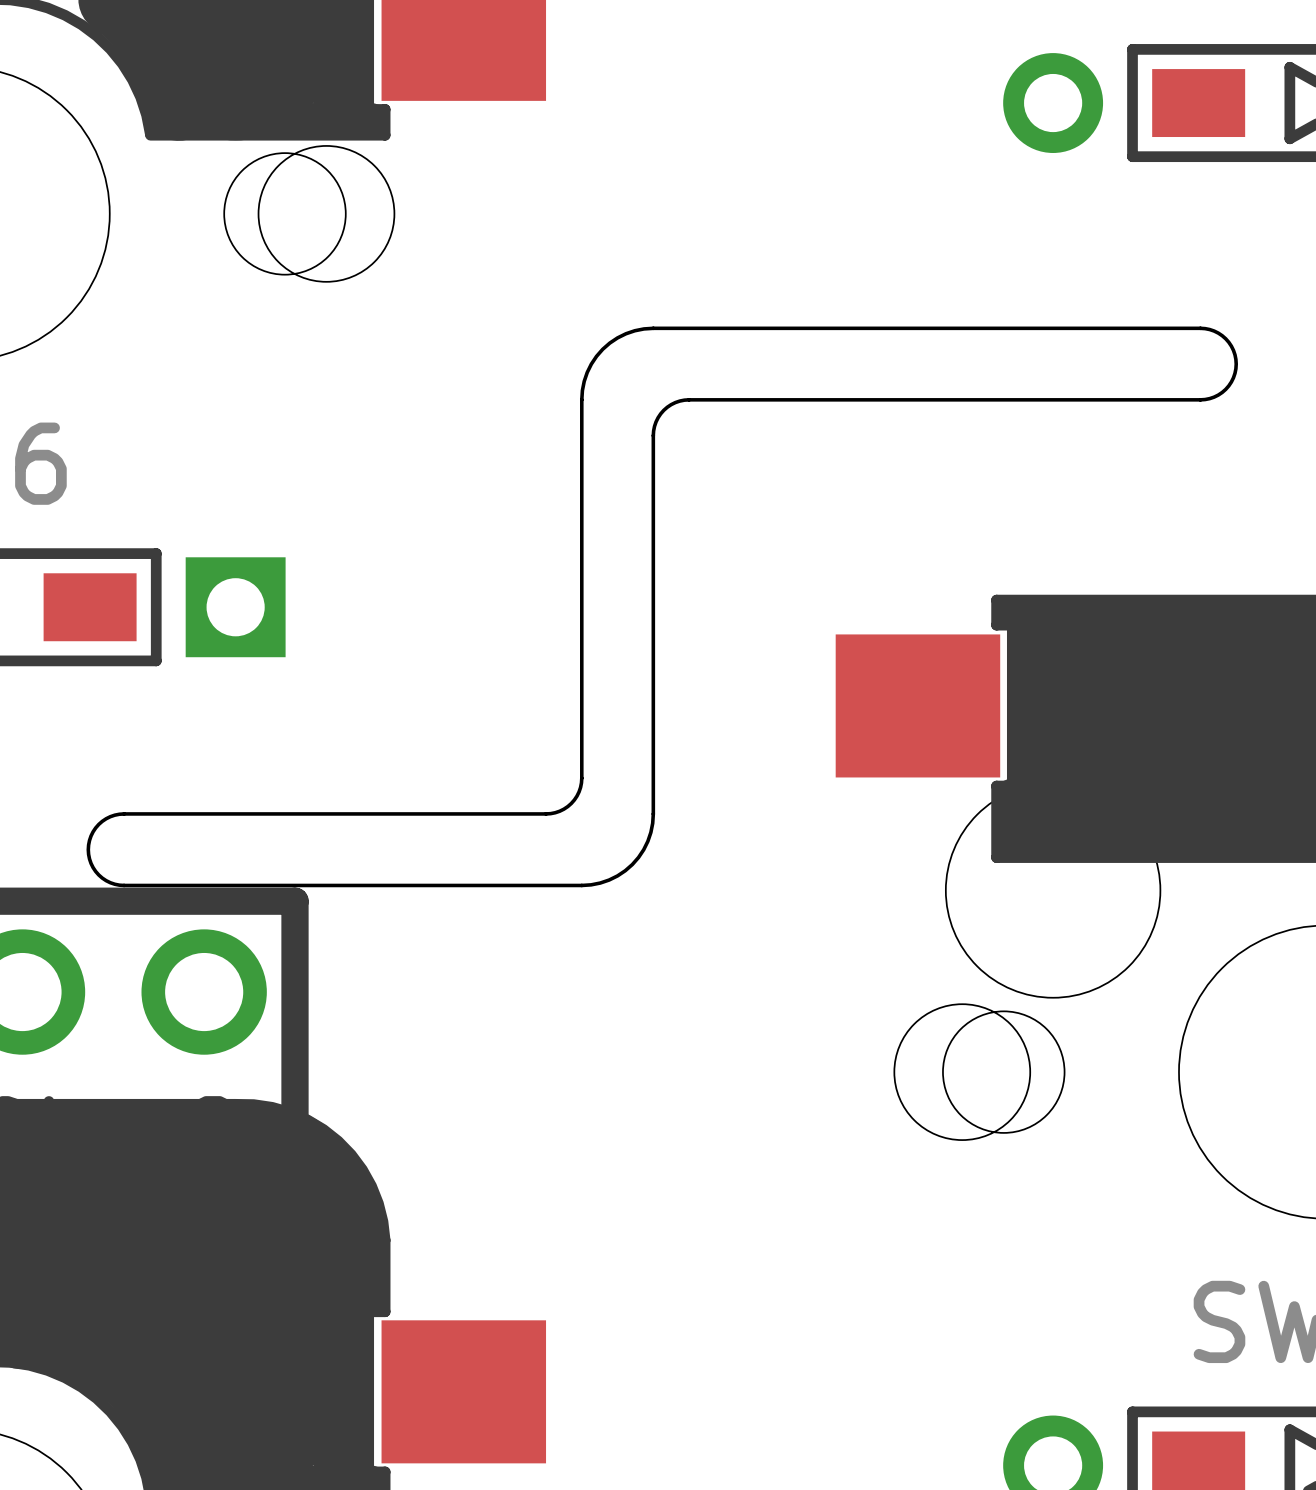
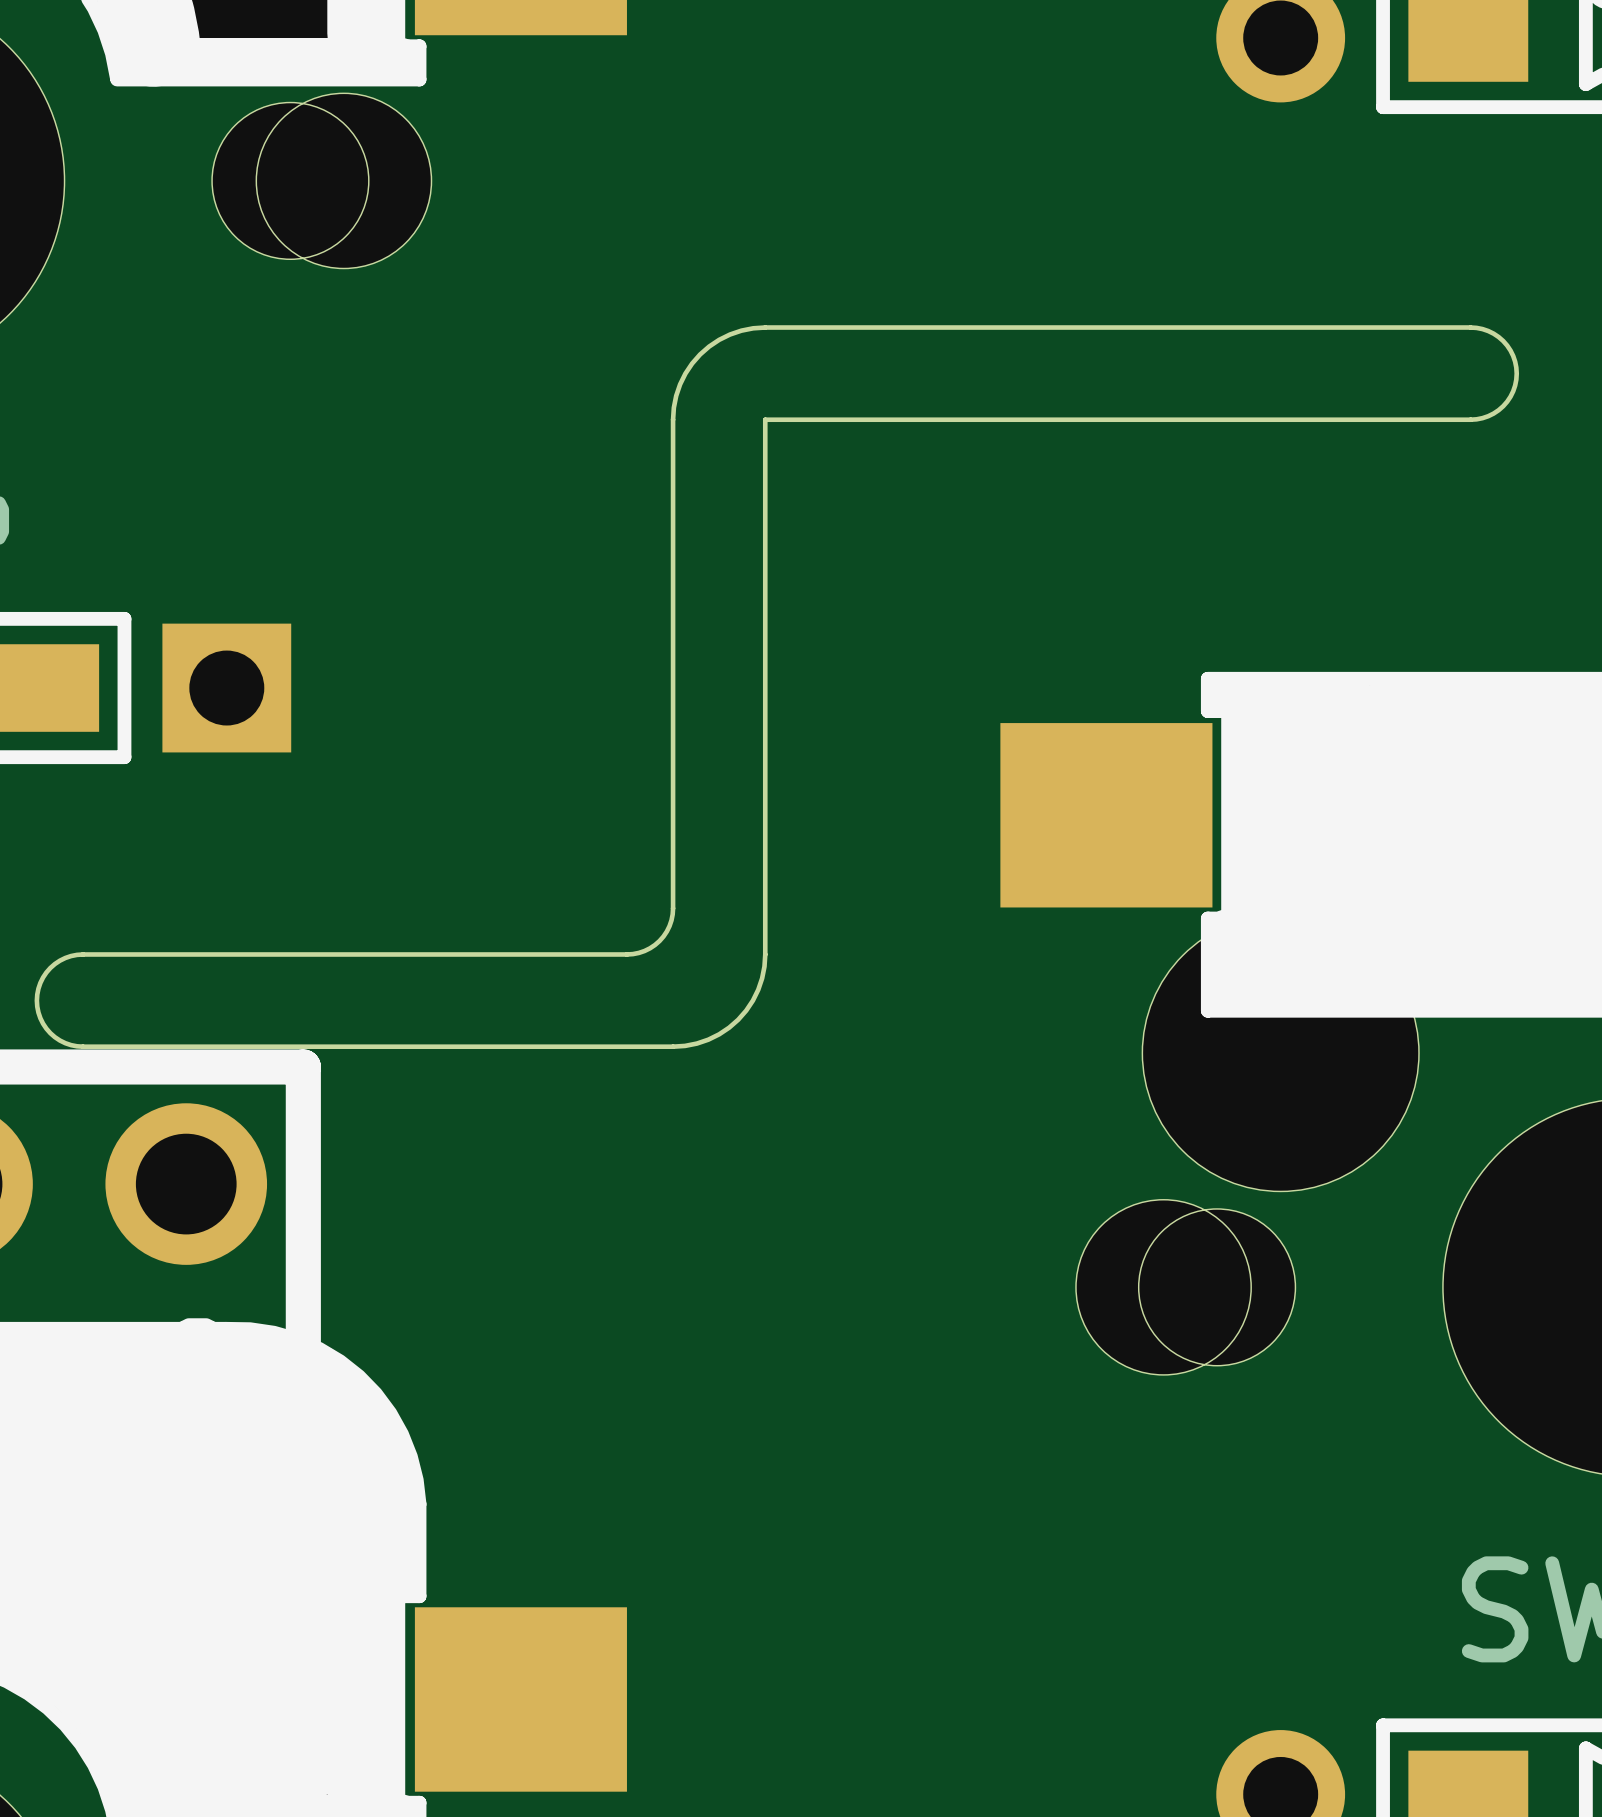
board edge: (581, 399) (587, 372) (602, 349) (625, 333) (653, 328) (1200, 328) (1209, 329) (1222, 335) (1231, 346) (1235, 359) (1234, 373) (1228, 385) (1218, 395) (1205, 399) (689, 399) (675, 402) (663, 410) (656, 421) (653, 435) -> (673, 419) (673, 407) (680, 384) (692, 363) (700, 354) (719, 339) (729, 334) (753, 328) (765, 327) (1470, 327) (1488, 331) (1503, 341) (1513, 355) (1516, 367) (1515, 385) (1507, 401) (1493, 413) (1476, 419) (765, 419) (765, 466)

